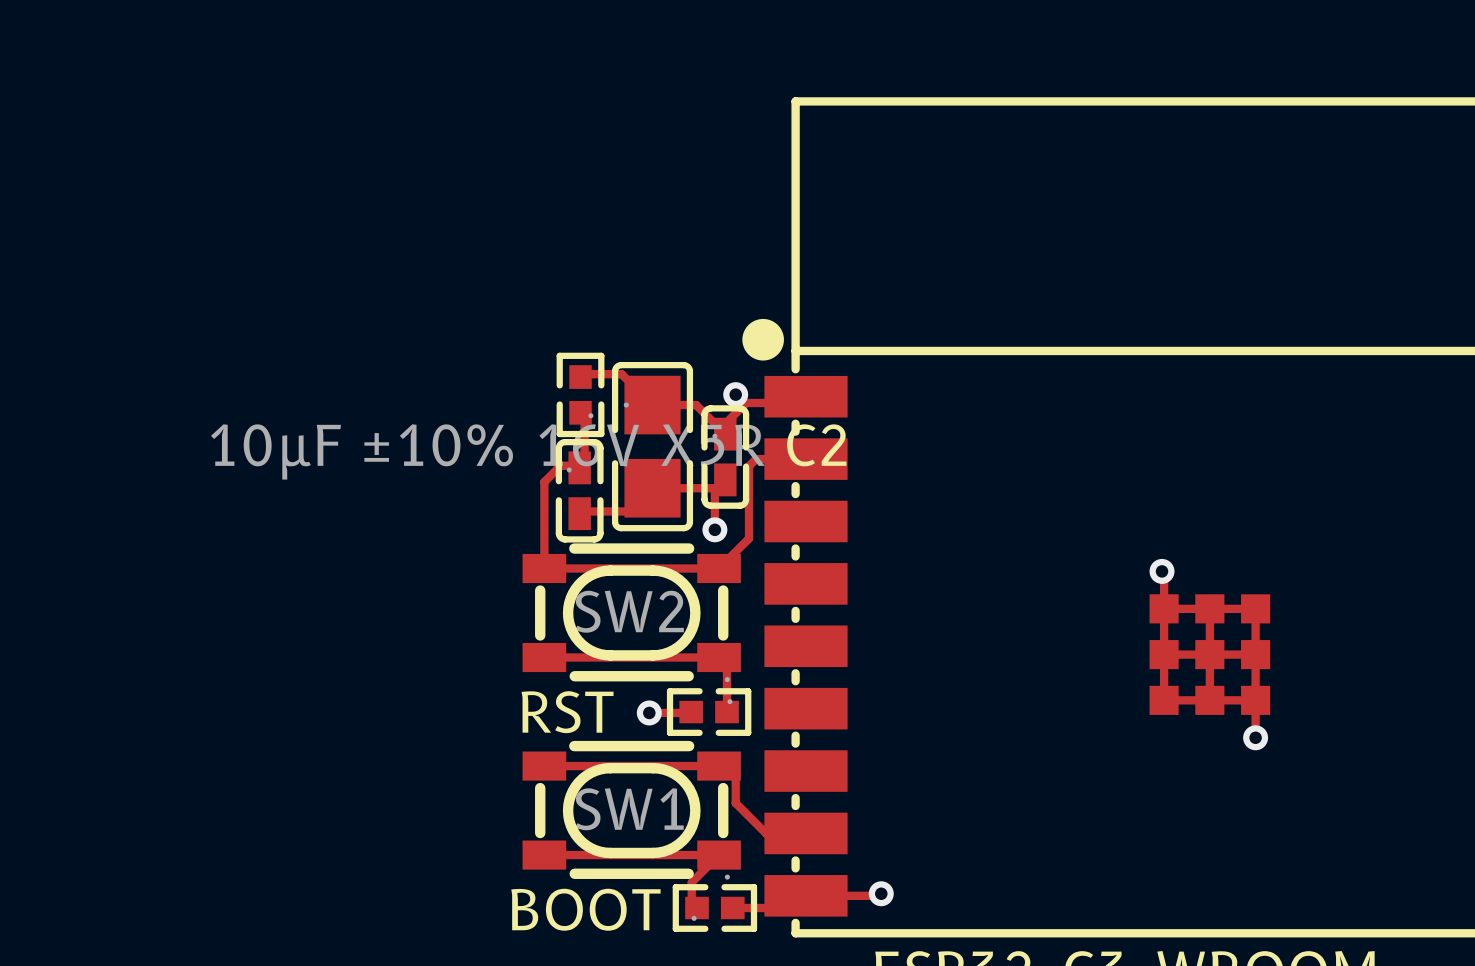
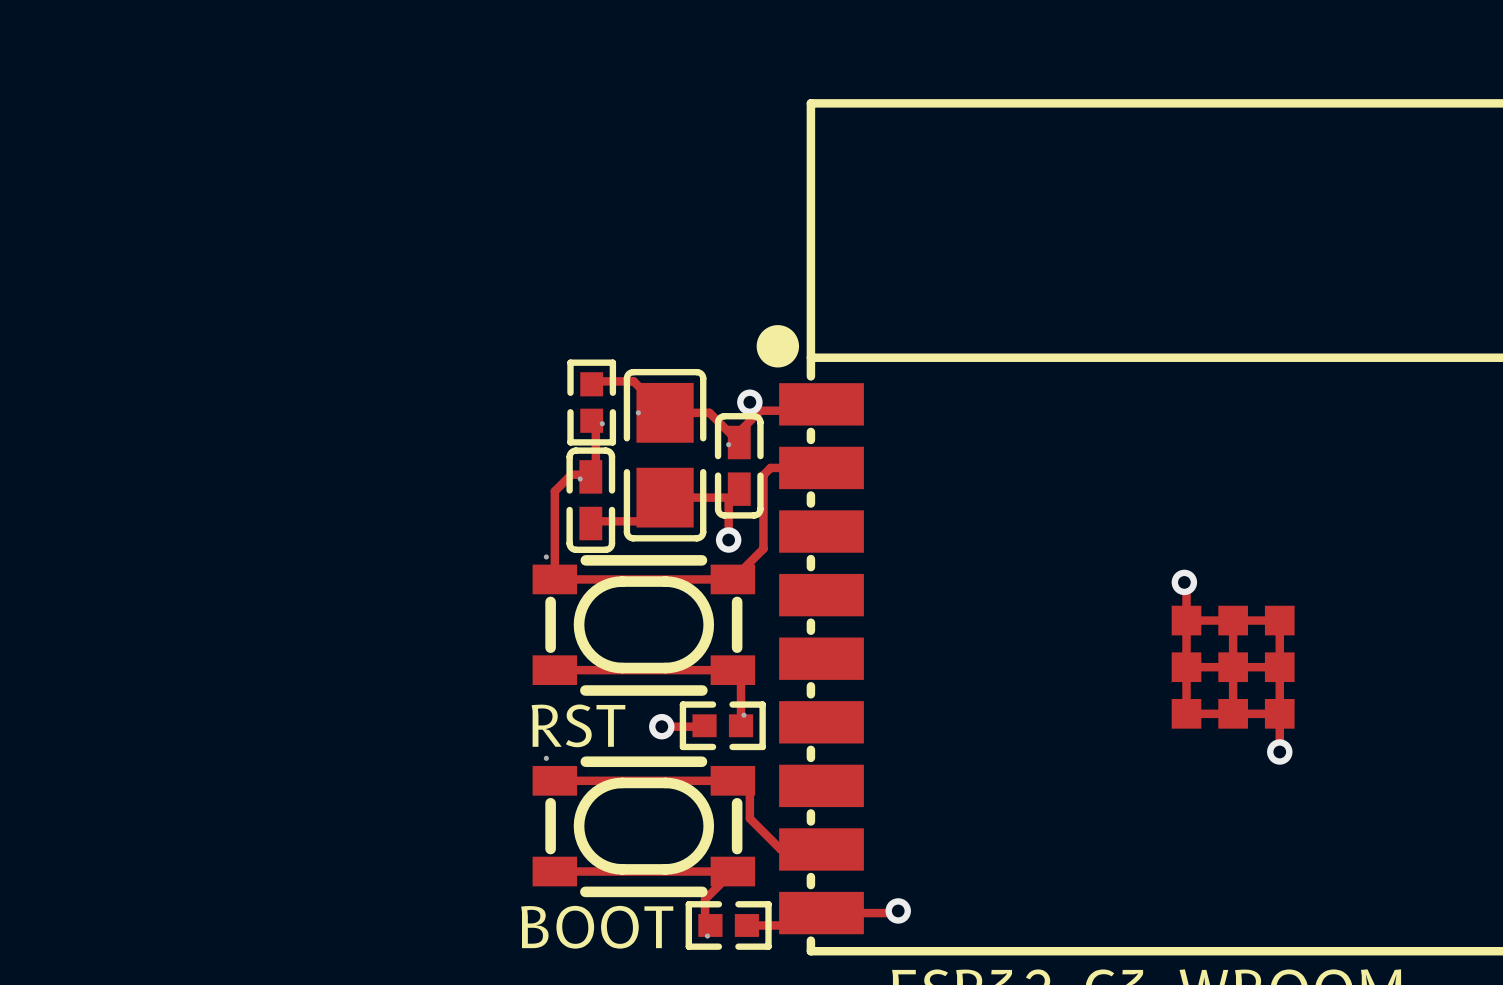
C2 name: C2 (816, 445) -> none
C2 value: 10µF ±10% 16V X5R (487, 451) -> none
SW2: (631, 612) -> none
part: none -> (643, 625)
SW1: (631, 810) -> none
part: none -> (643, 826)

